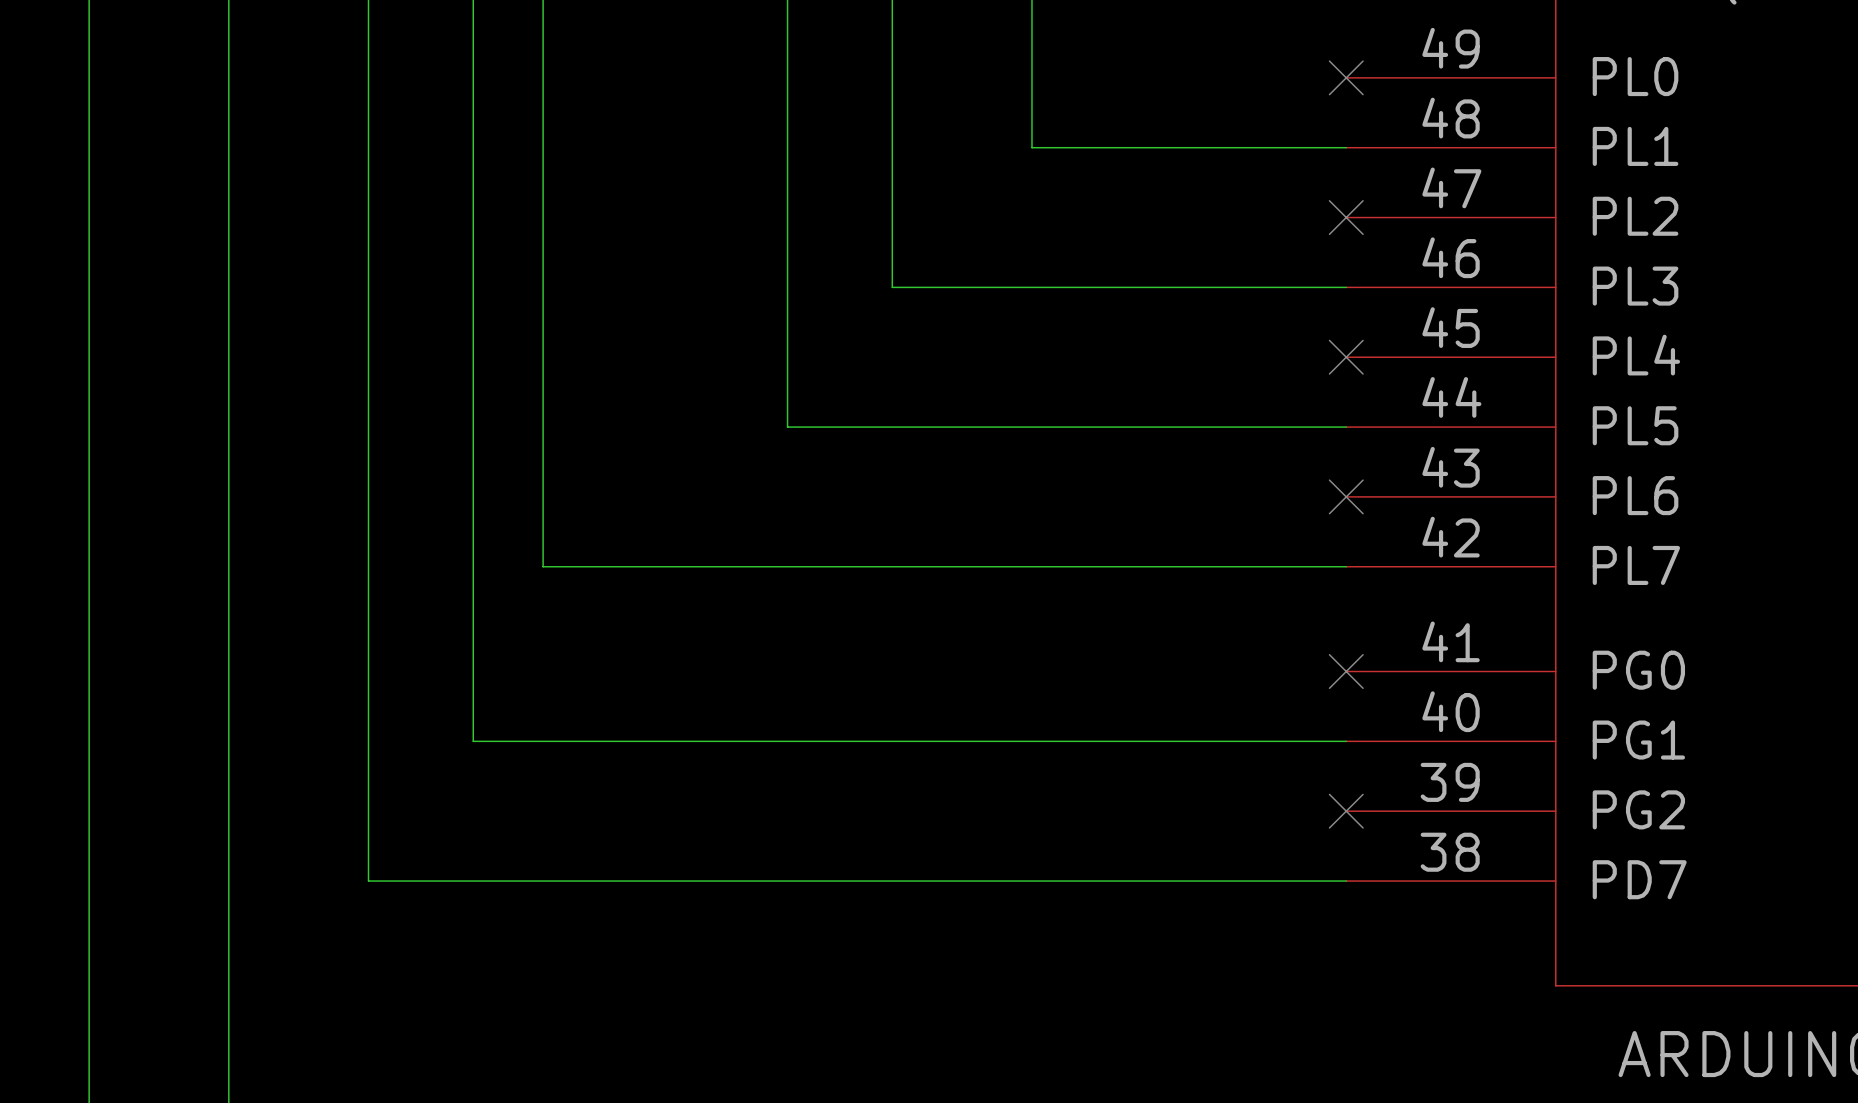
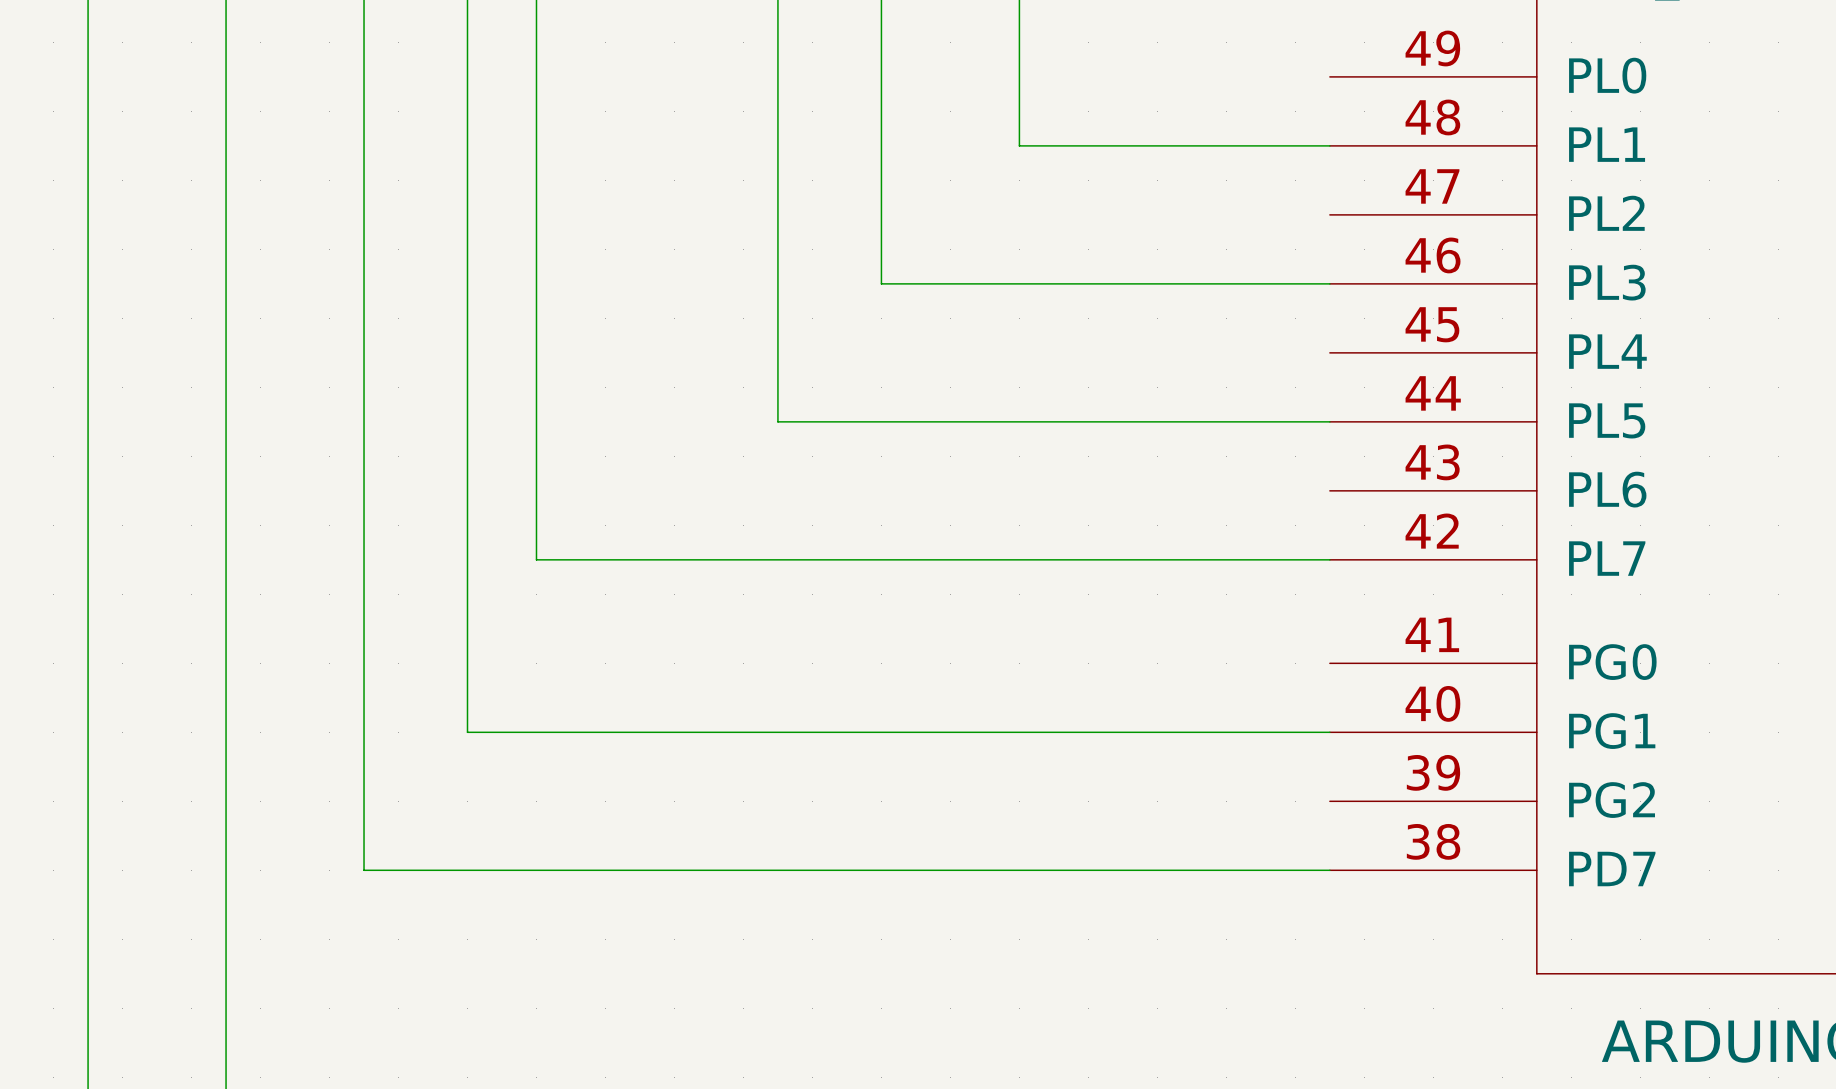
no-connect mark: (1346, 77) -> none
no-connect mark: (1346, 217) -> none
no-connect mark: (1346, 357) -> none
no-connect mark: (1346, 496) -> none
no-connect mark: (1346, 671) -> none
no-connect mark: (1346, 811) -> none

